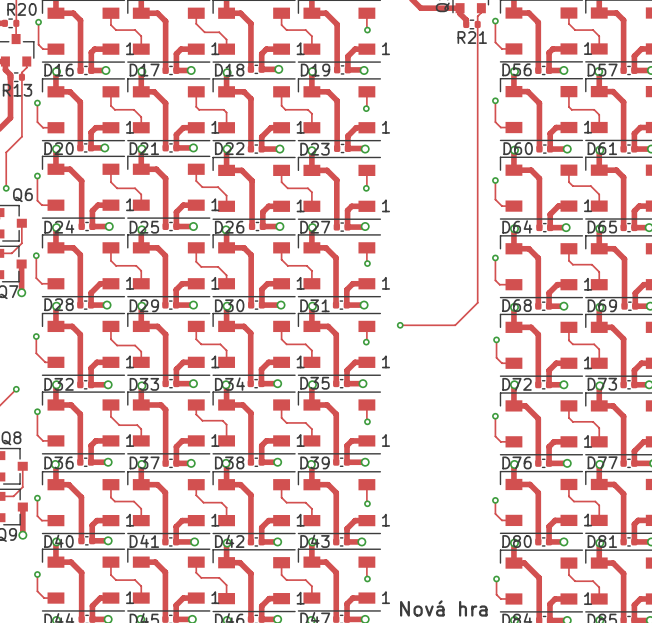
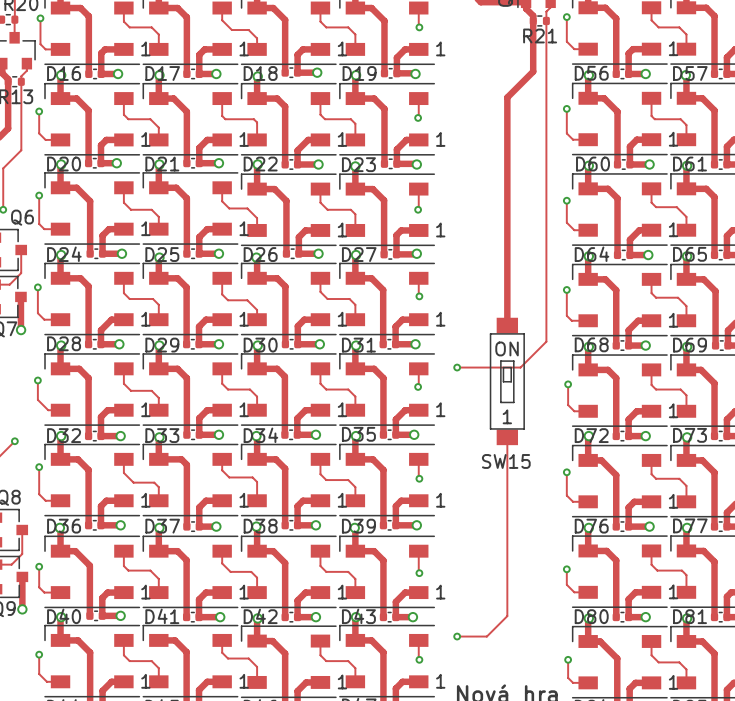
track: none -> (533, 20) (533, 71) (507, 97) (507, 325)
SW15: none -> (507, 381)
track: none -> (507, 437) (507, 616) (486, 636) (457, 636)
via: none -> (457, 636)

